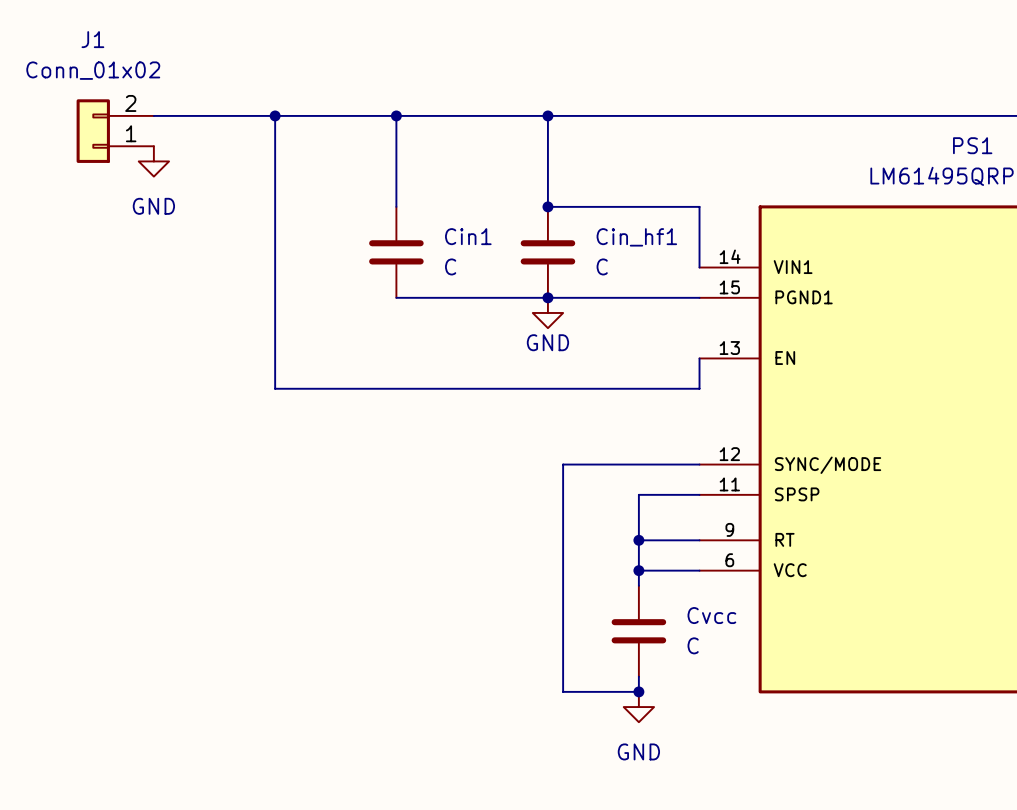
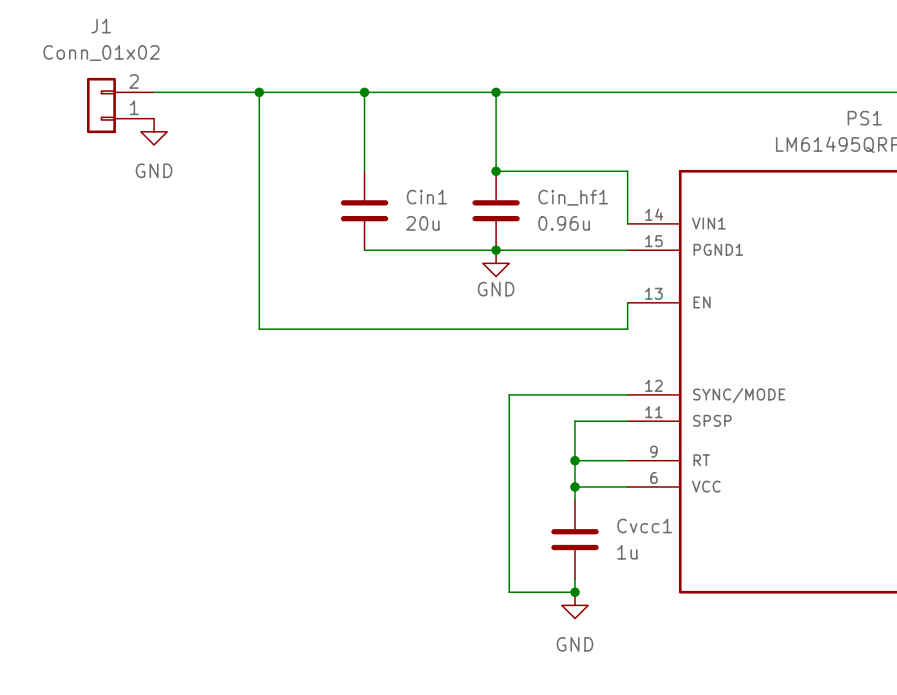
Cin1 value: C (450, 266) -> 20u (422, 223)
Cin_hf1 value: C (602, 266) -> 0.96u (564, 223)
Cvcc name: Cvcc (711, 615) -> Cvcc1 (644, 525)
Cvcc value: C (693, 645) -> 1u (627, 552)

